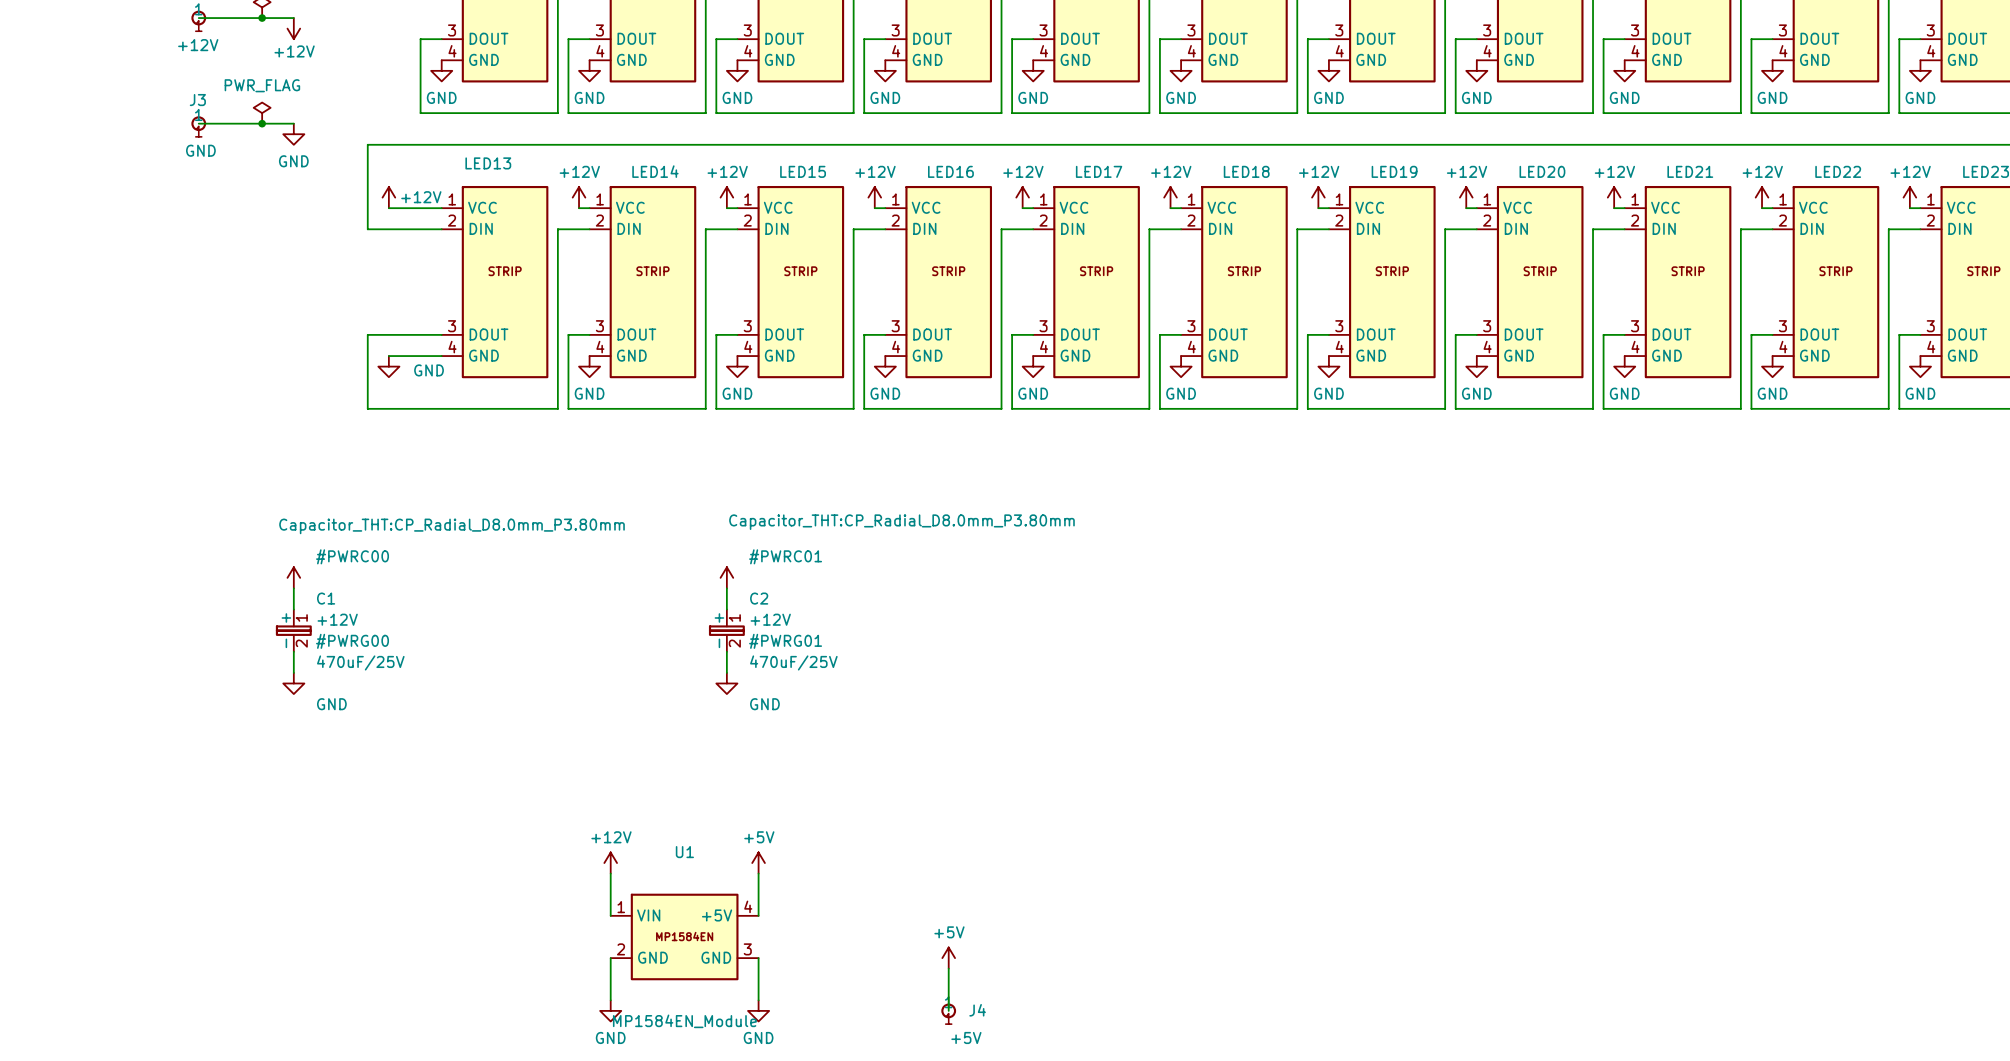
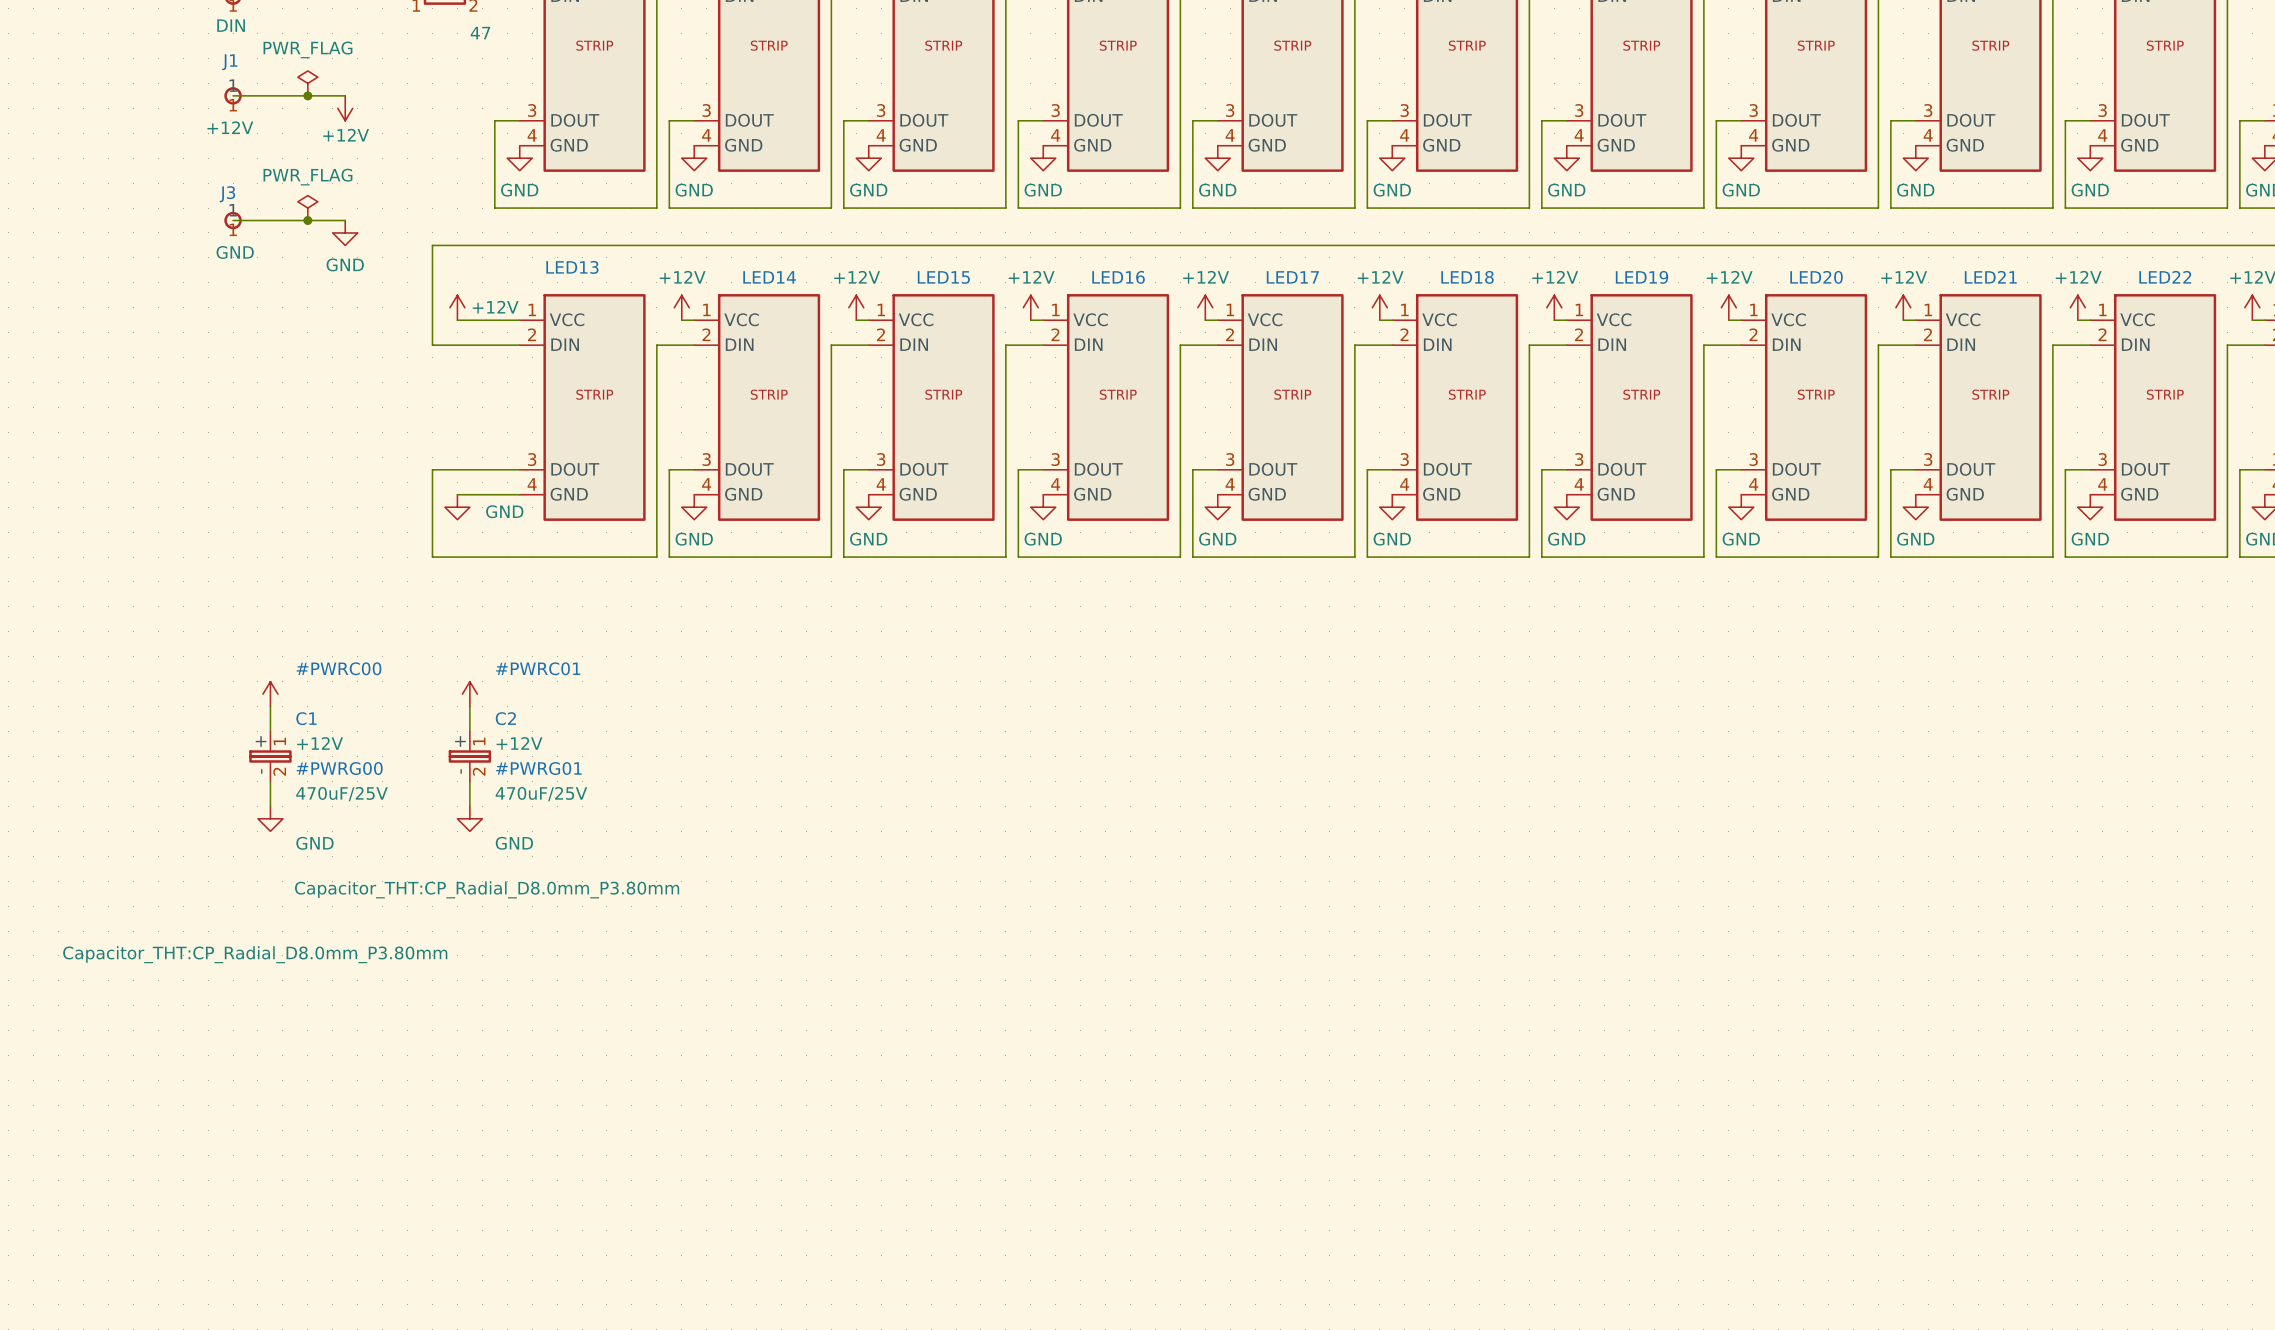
C2 text position: Capacitor_THT:CP_Radial_D8.0mm_P3.80mm (901, 522) -> Capacitor_THT:CP_Radial_D8.0mm_P3.80mm (487, 889)
C1 text position: Capacitor_THT:CP_Radial_D8.0mm_P3.80mm (452, 526) -> Capacitor_THT:CP_Radial_D8.0mm_P3.80mm (255, 954)
wire: none -> (469, 706) (469, 731)
#PWRC00 position: +12V (293, 577) -> +12V (270, 694)
#PWRC01 position: +12V (726, 577) -> +12V (469, 694)
wire: (293, 588) (293, 609) -> (270, 706) (270, 731)
wire: (726, 588) (726, 609) -> none
wire: none -> (469, 781) (469, 806)
C1 position: (293, 630) -> (270, 756)
C2 position: (726, 630) -> (469, 756)
wire: (293, 651) (293, 672) -> (270, 781) (270, 806)
wire: (726, 651) (726, 672) -> none
#PWRG00 position: GND (293, 683) -> GND (270, 818)
#PWRG01 position: GND (726, 683) -> GND (469, 818)
power symbol: +12V (610, 863) -> none
power symbol: +5V (758, 863) -> none
wire: (610, 873) (610, 915) -> none
wire: (758, 873) (758, 915) -> none
U1: MP1584EN_Module (684, 936) -> none
wire: (610, 958) (610, 1000) -> none
wire: (758, 958) (758, 1000) -> none
power symbol: +5V (948, 958) -> none
wire: (948, 968) (948, 1010) -> none
power symbol: GND (610, 1010) -> none
power symbol: GND (758, 1010) -> none
J4: +5V (948, 1010) -> none

